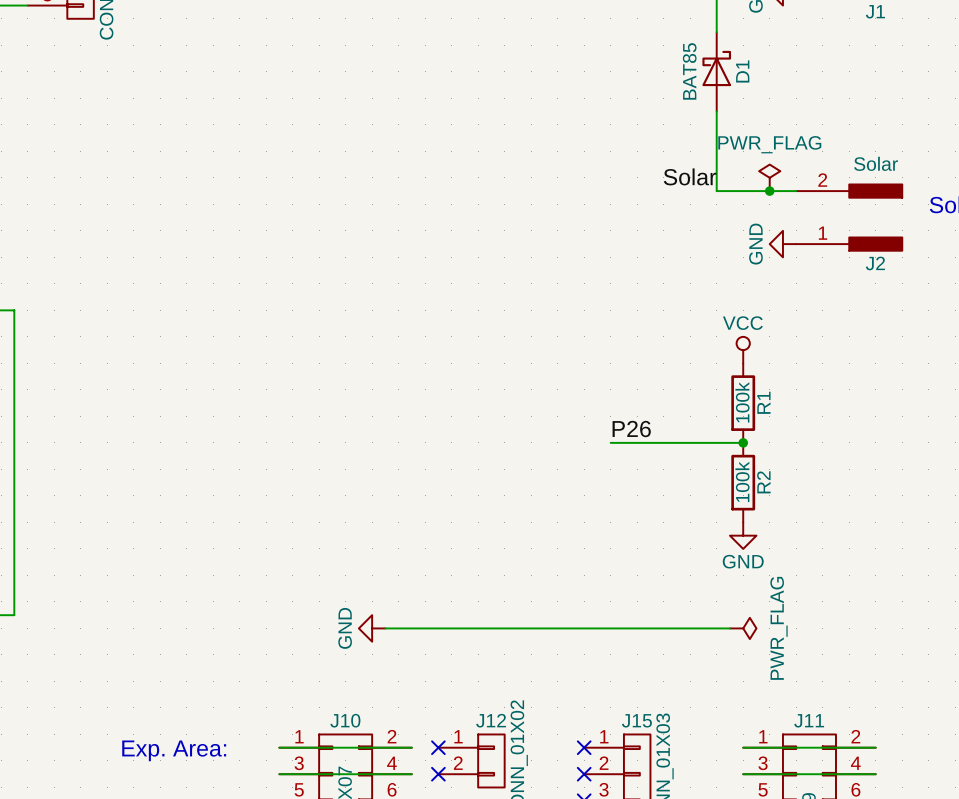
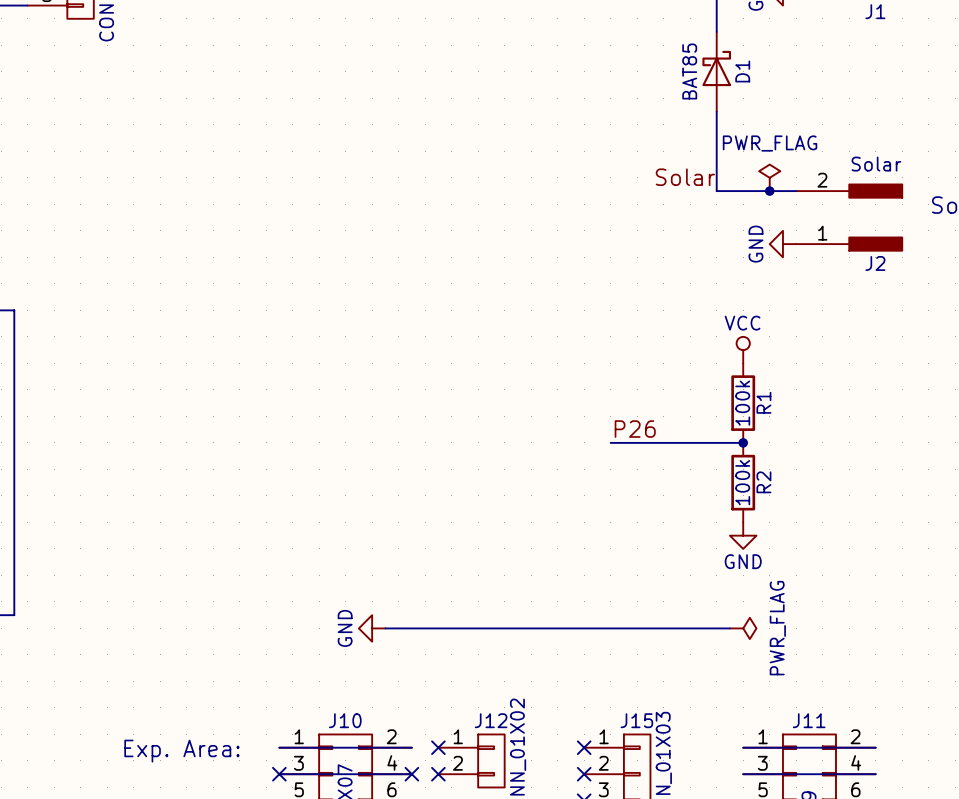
no-connect mark: none -> (279, 774)
no-connect mark: none -> (411, 774)

